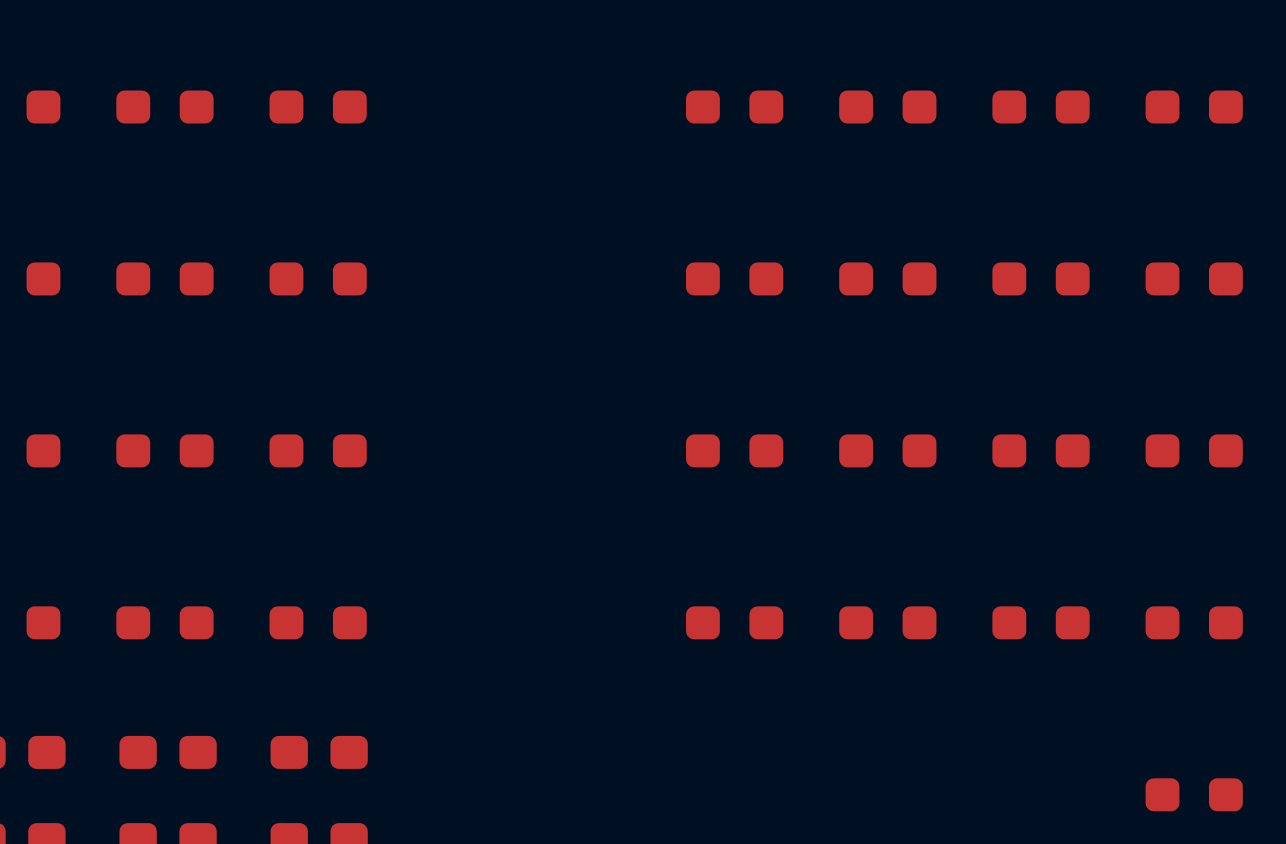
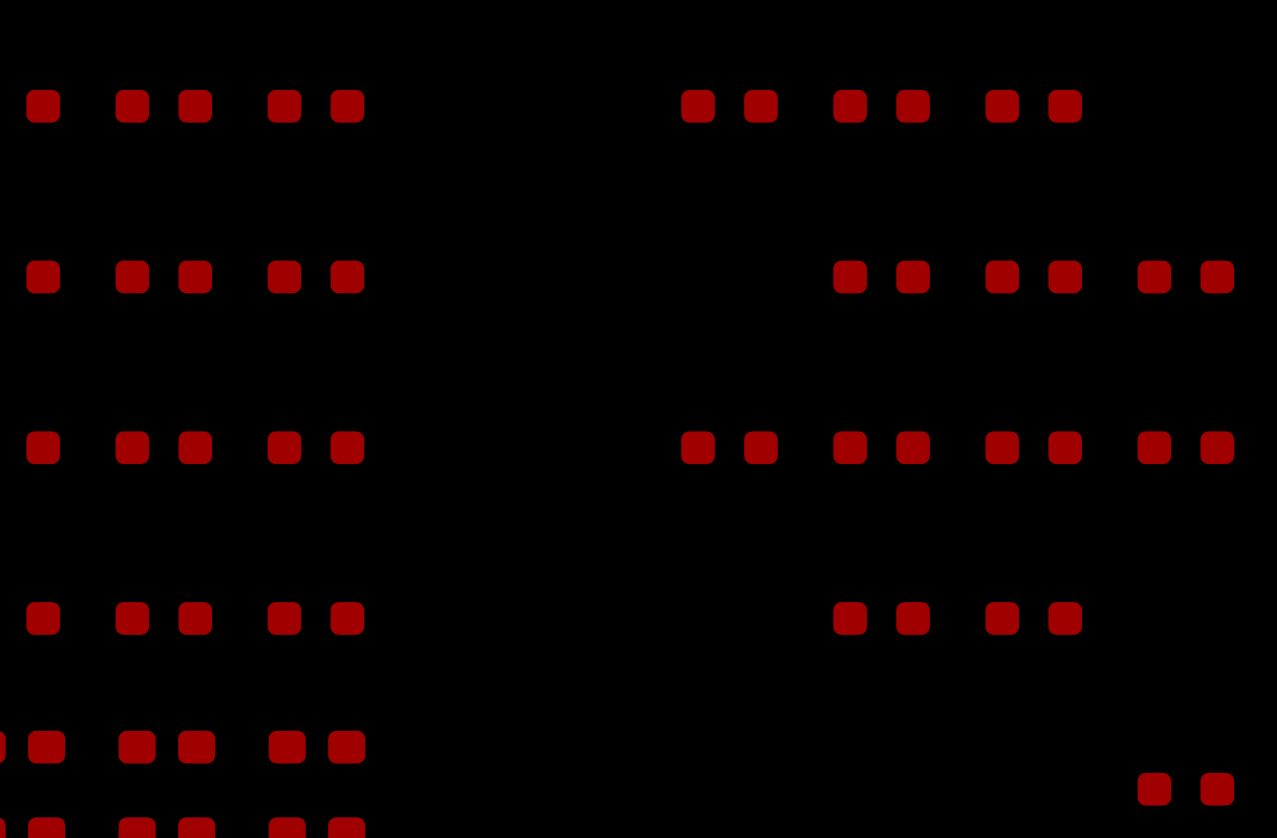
part: (1194, 107) -> none
part: (734, 278) -> none
part: (734, 622) -> none
part: (1194, 622) -> none

